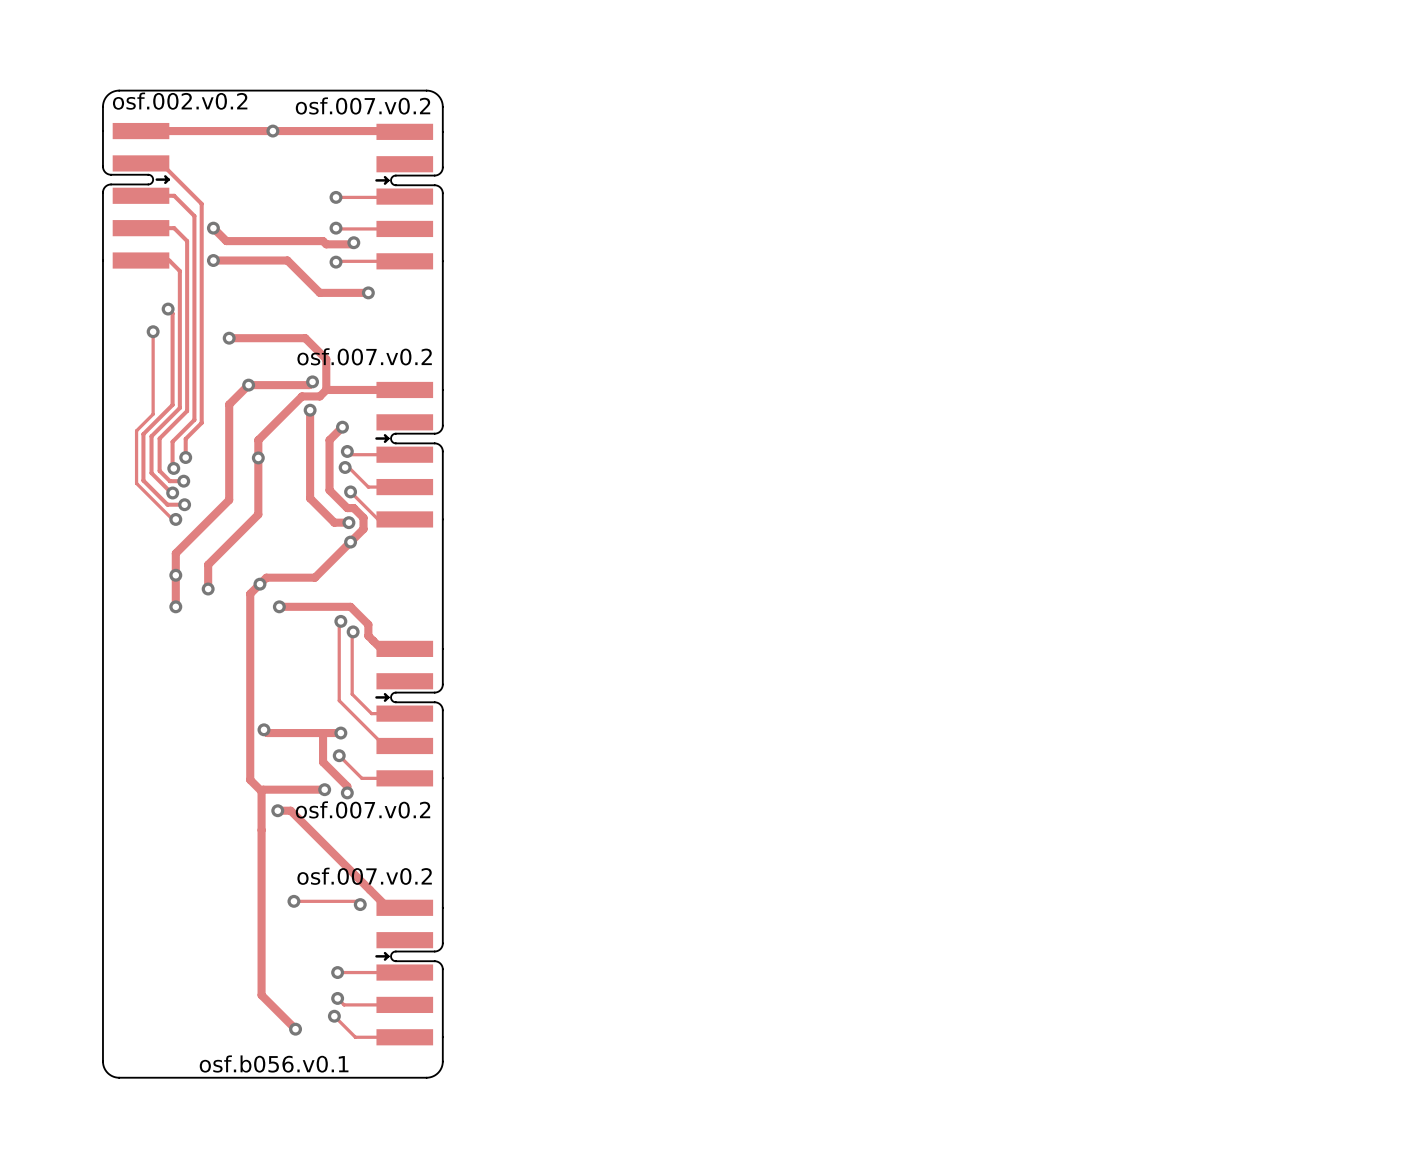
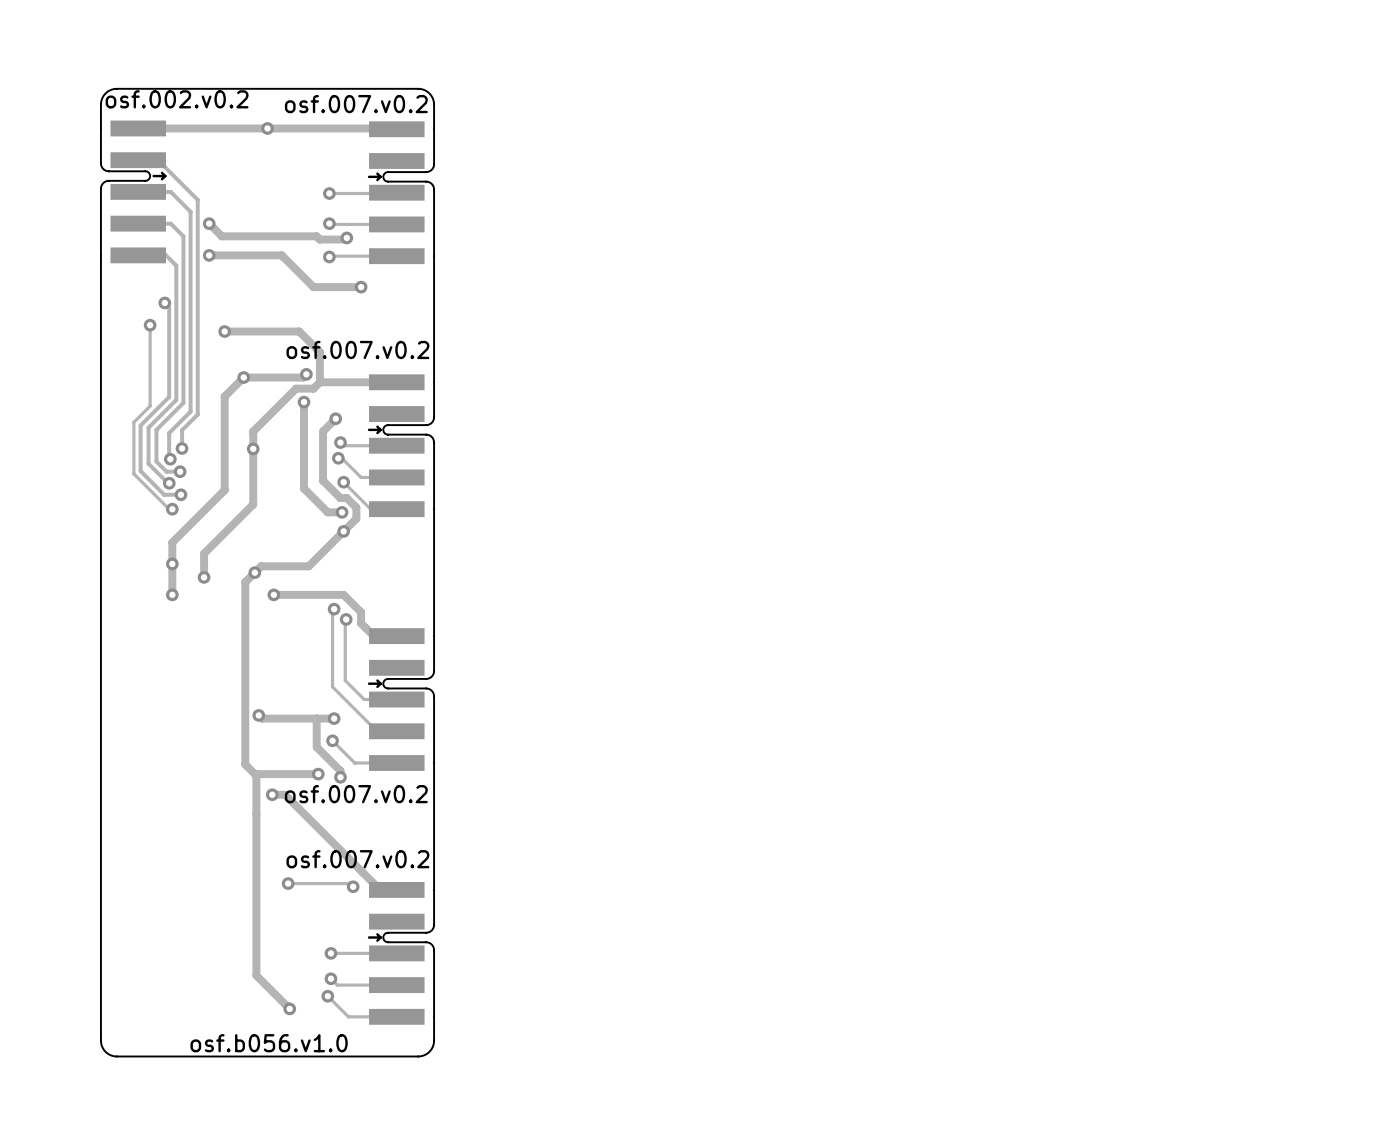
text: osf.b056.v0.1 (274, 1063) -> osf.b056.v1.0 (269, 1043)

